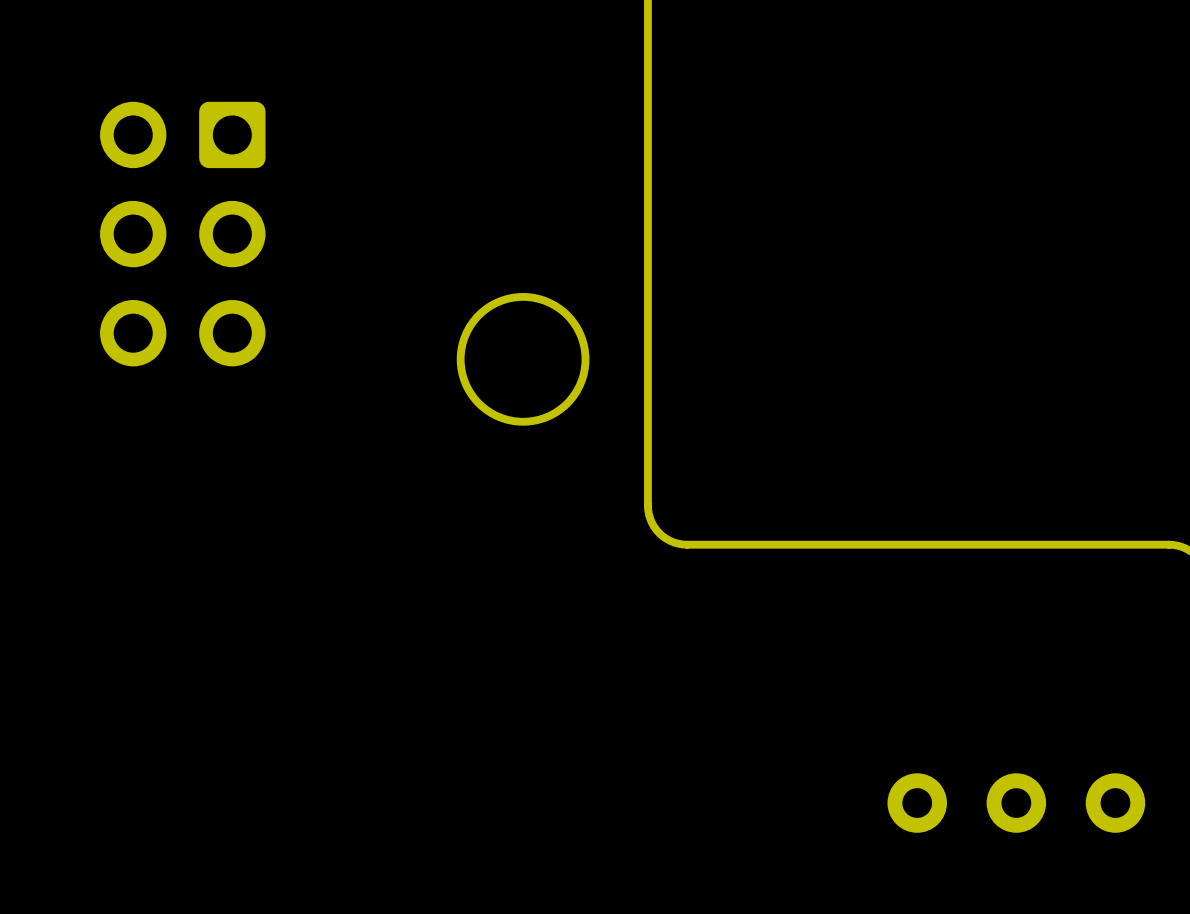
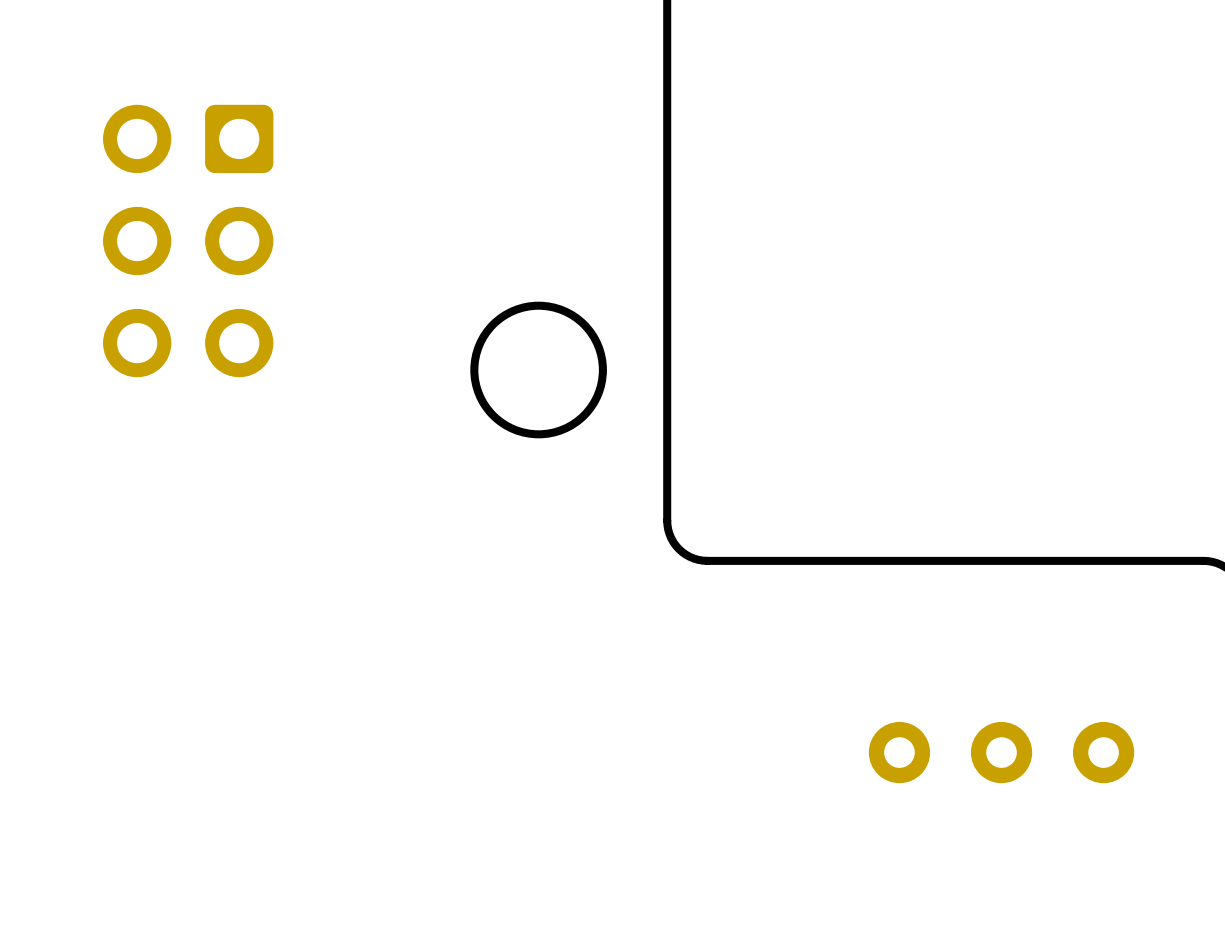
part position: (1016, 803) -> (1001, 752)

